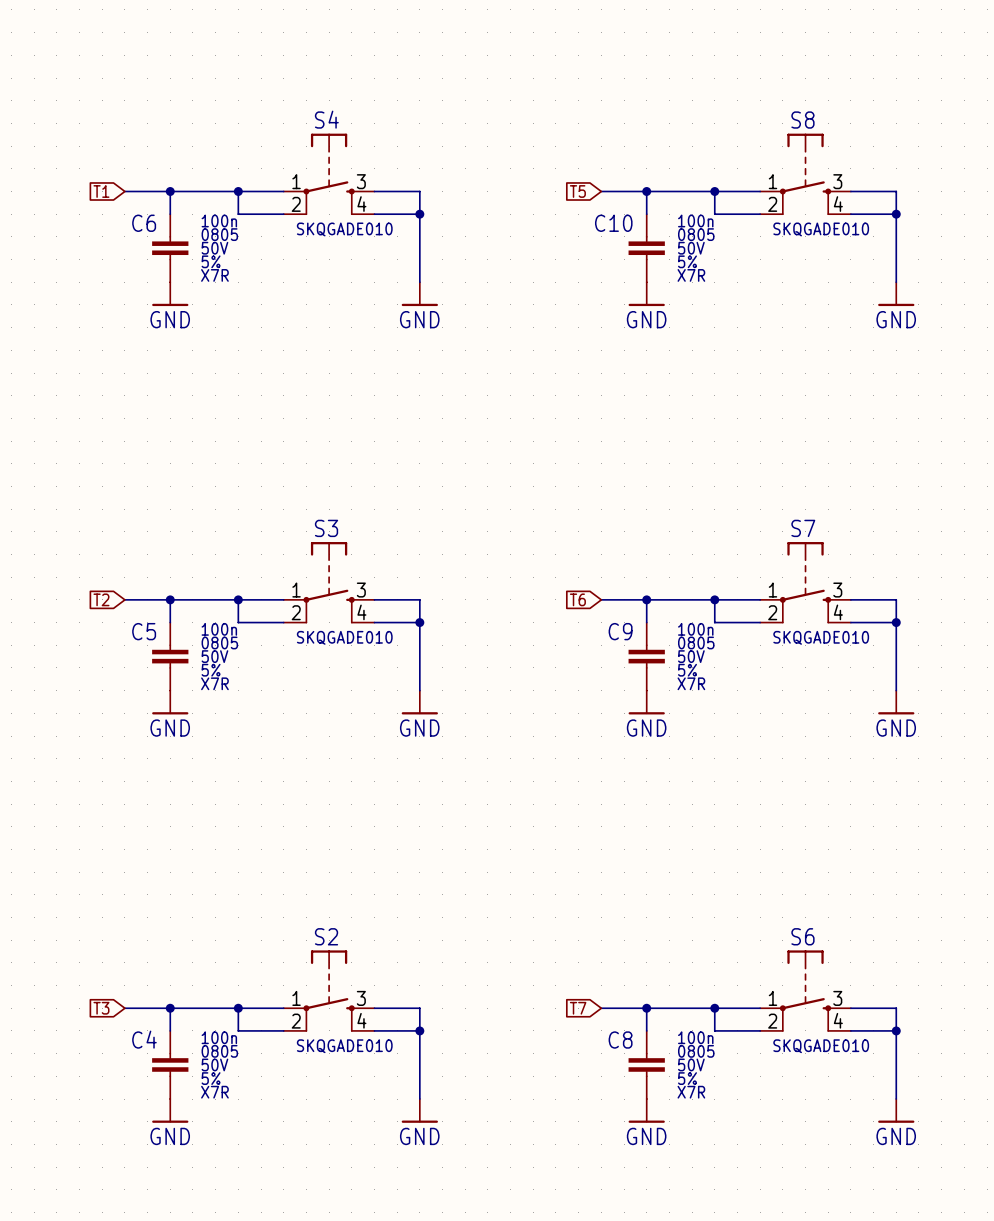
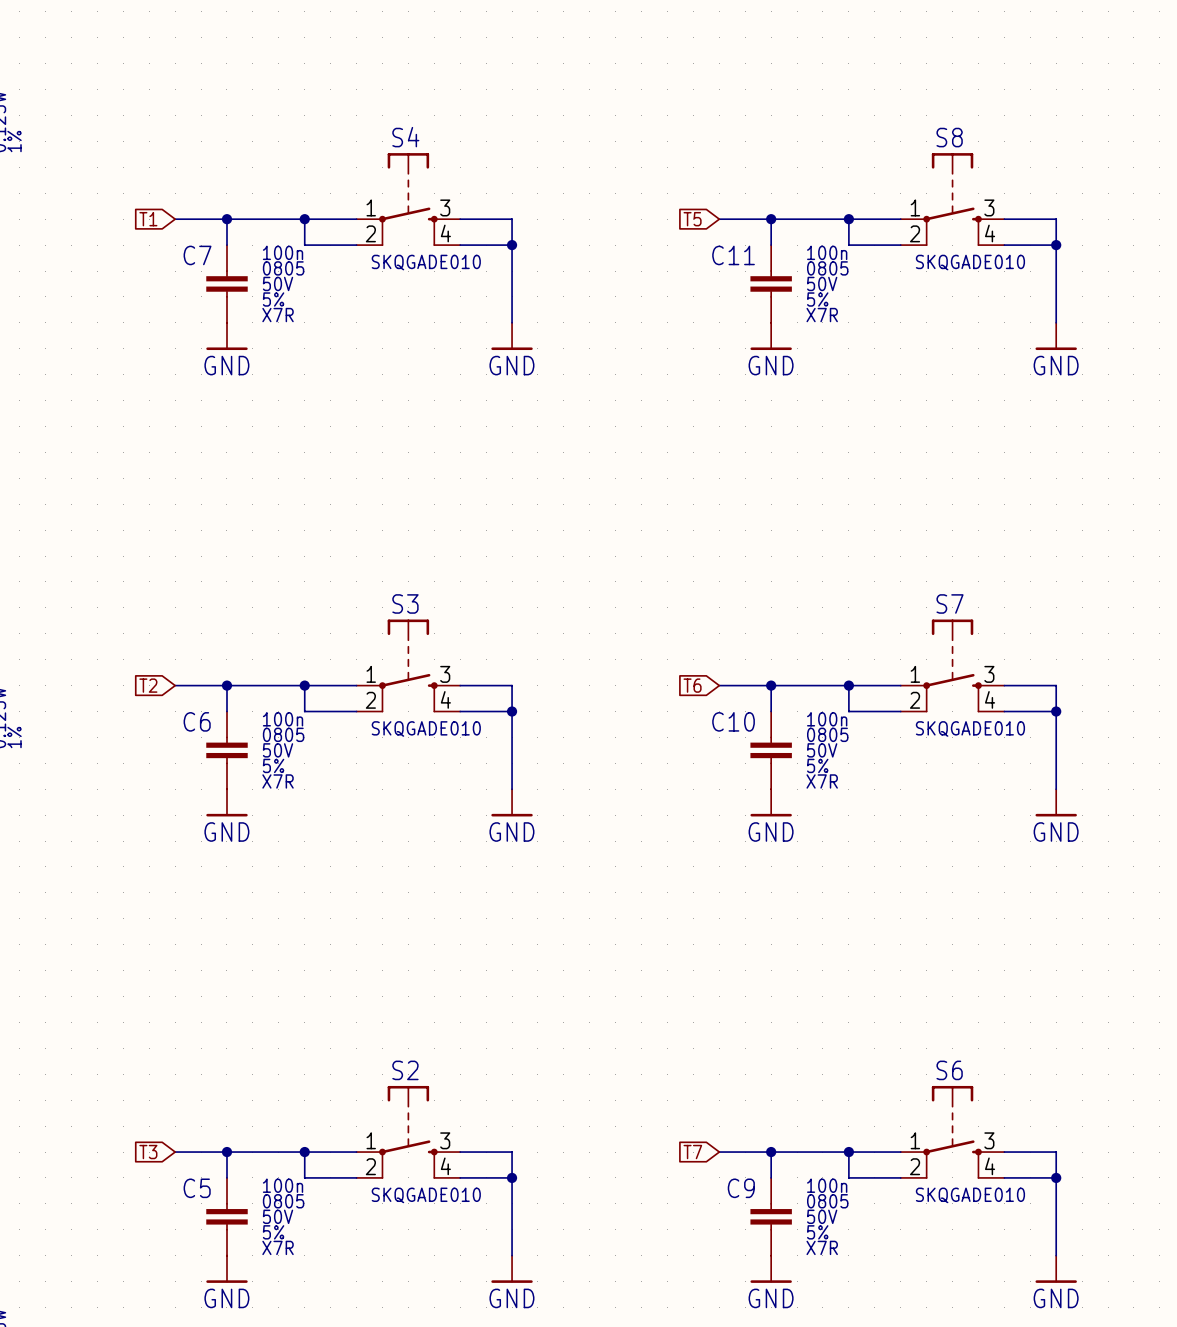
C6 name: C6 (144, 223) -> C7 (197, 255)
C10 name: C10 (613, 223) -> C11 (733, 255)
C5 name: C5 (144, 631) -> C6 (197, 721)
C9 name: C9 (620, 631) -> C10 (733, 721)
C4 name: C4 (144, 1039) -> C5 (197, 1188)
C8 name: C8 (620, 1040) -> C9 (741, 1188)

